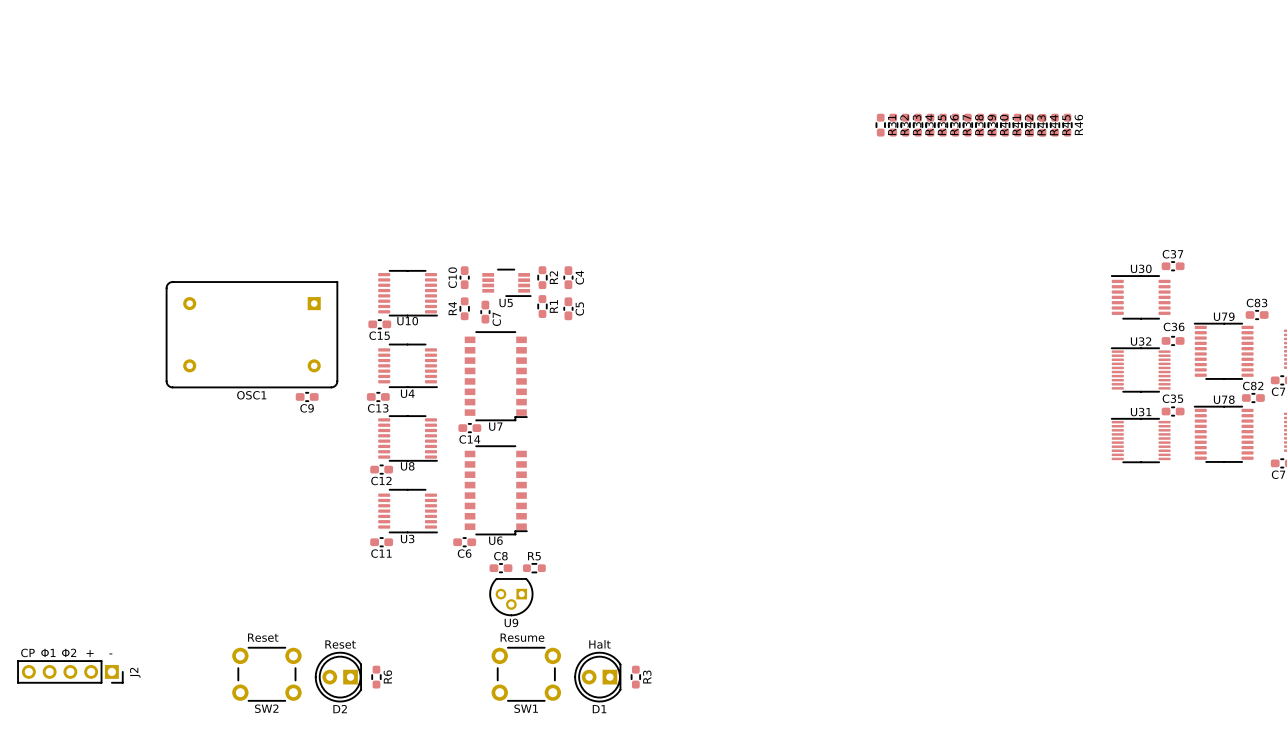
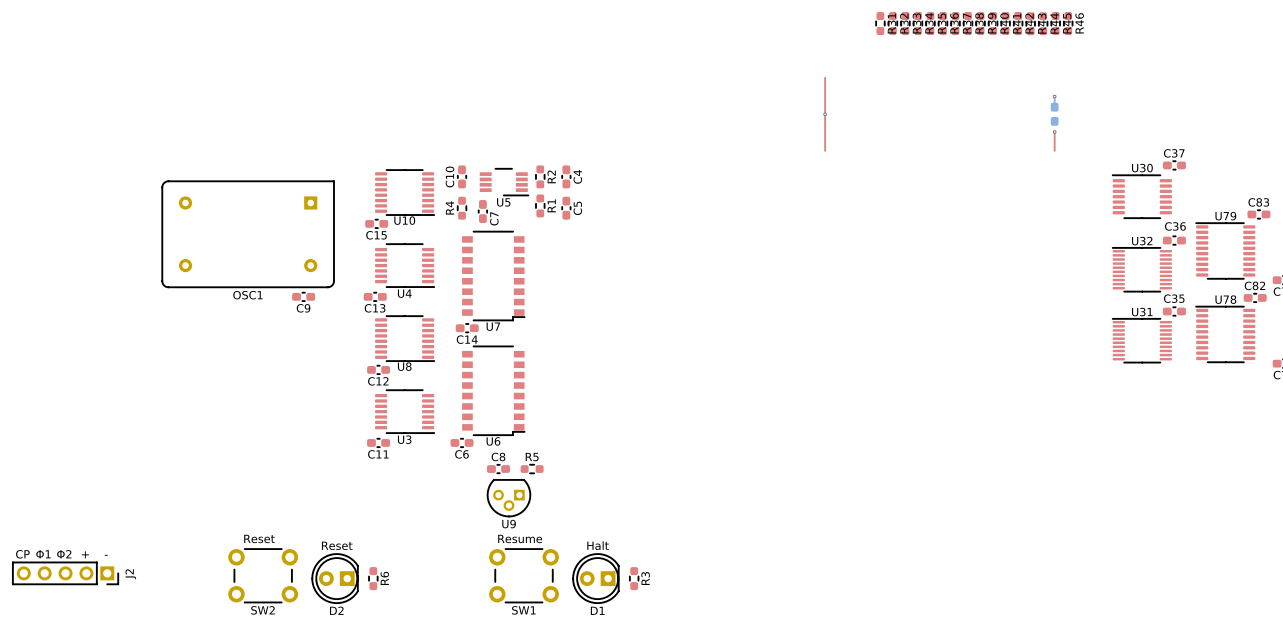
top track: none -> (825, 77) (825, 150)
bottom track: none -> (1054, 96) (1054, 107)
via: none -> (1054, 96)
via: none -> (825, 114)
part: none -> (1054, 114)
top track: none -> (1054, 132) (1054, 150)
via: none -> (1054, 132)

